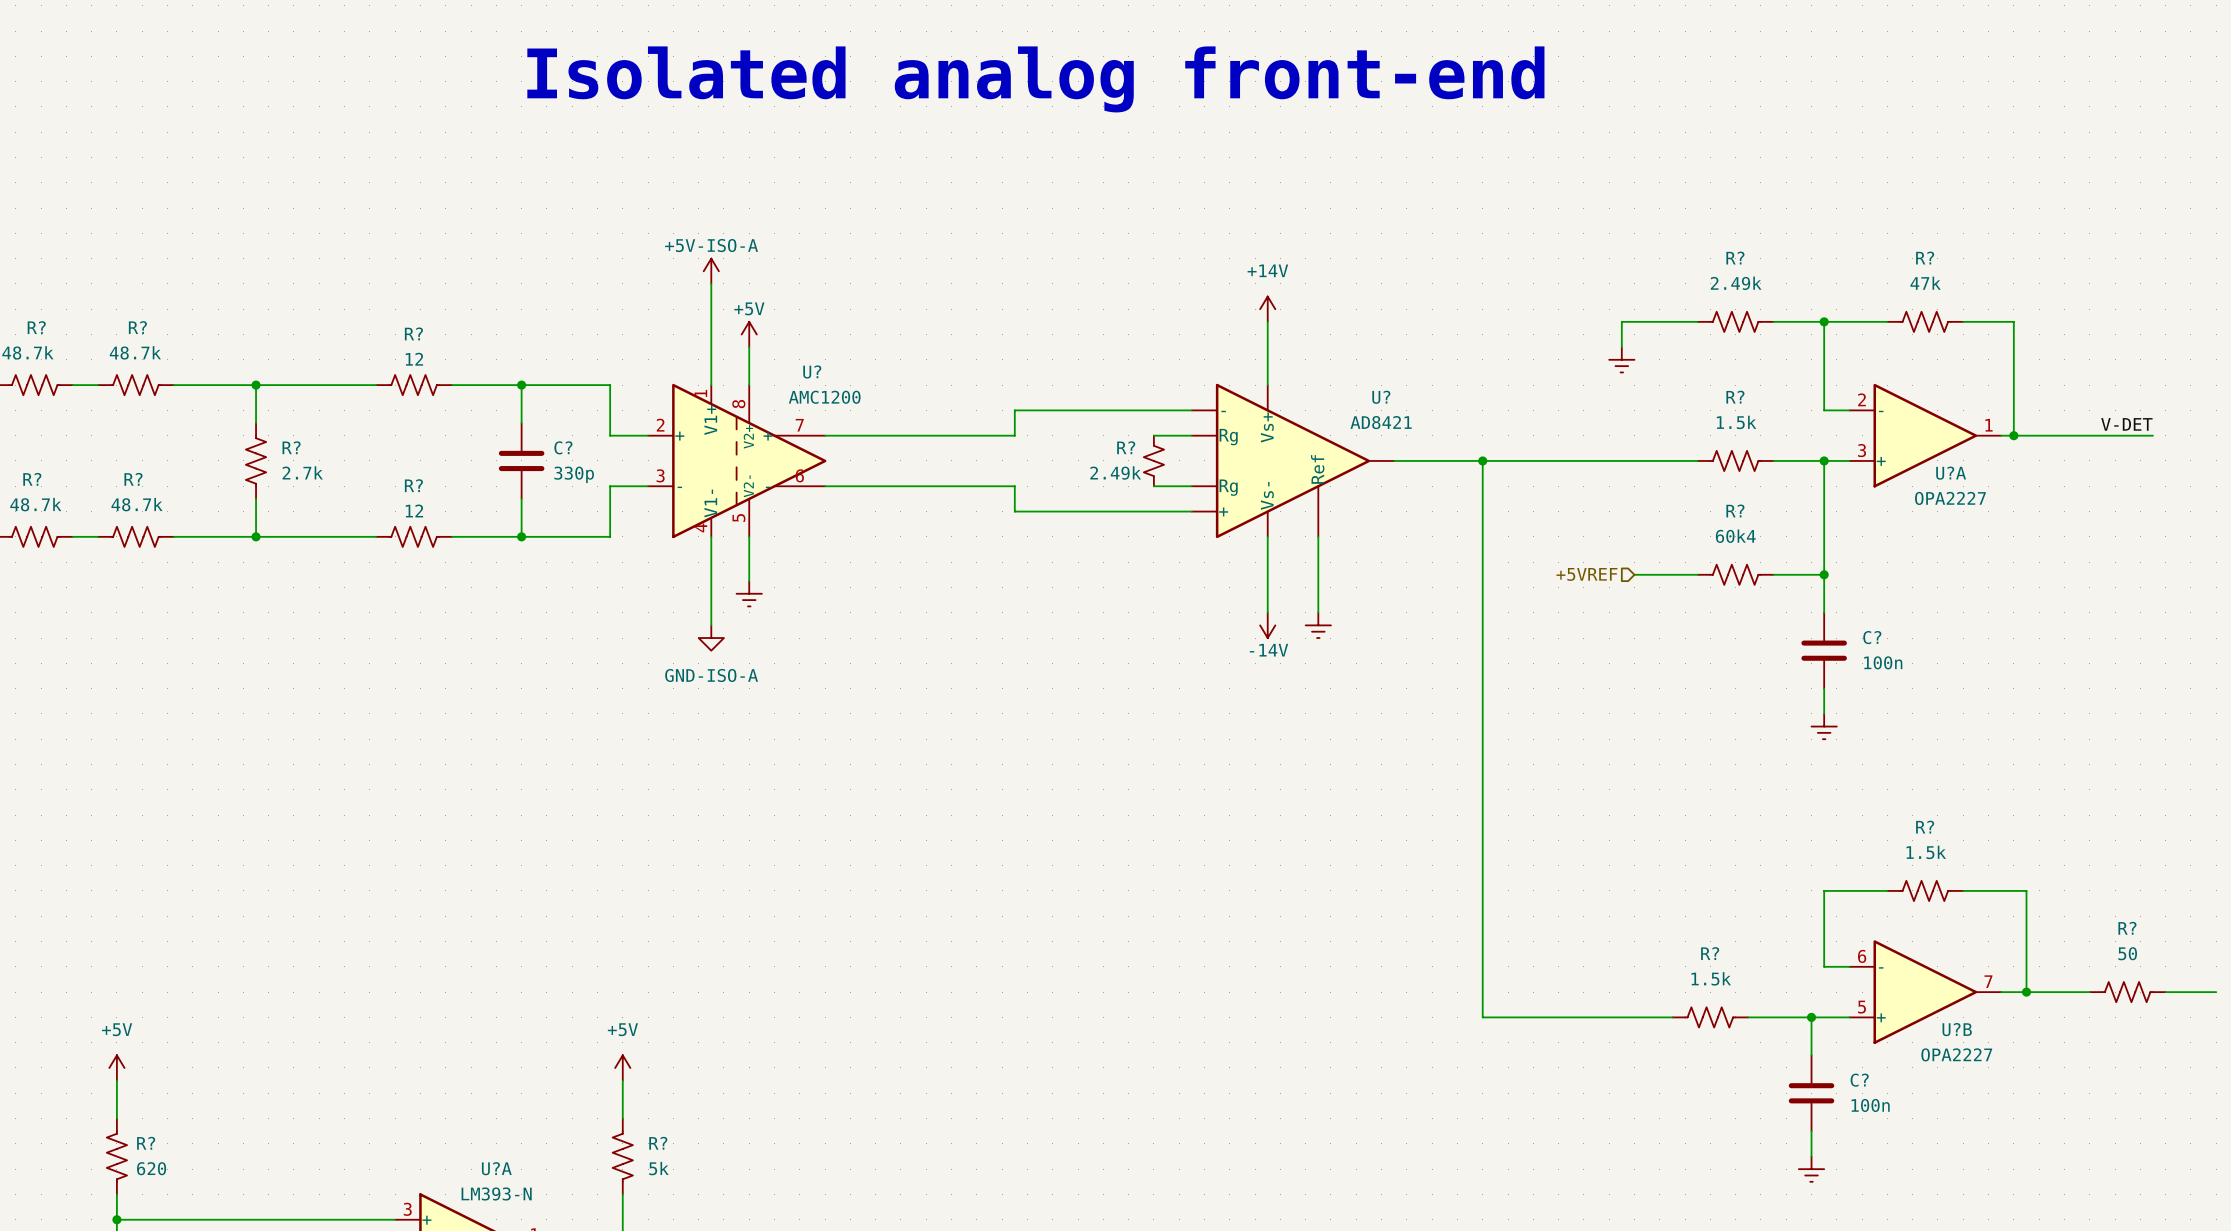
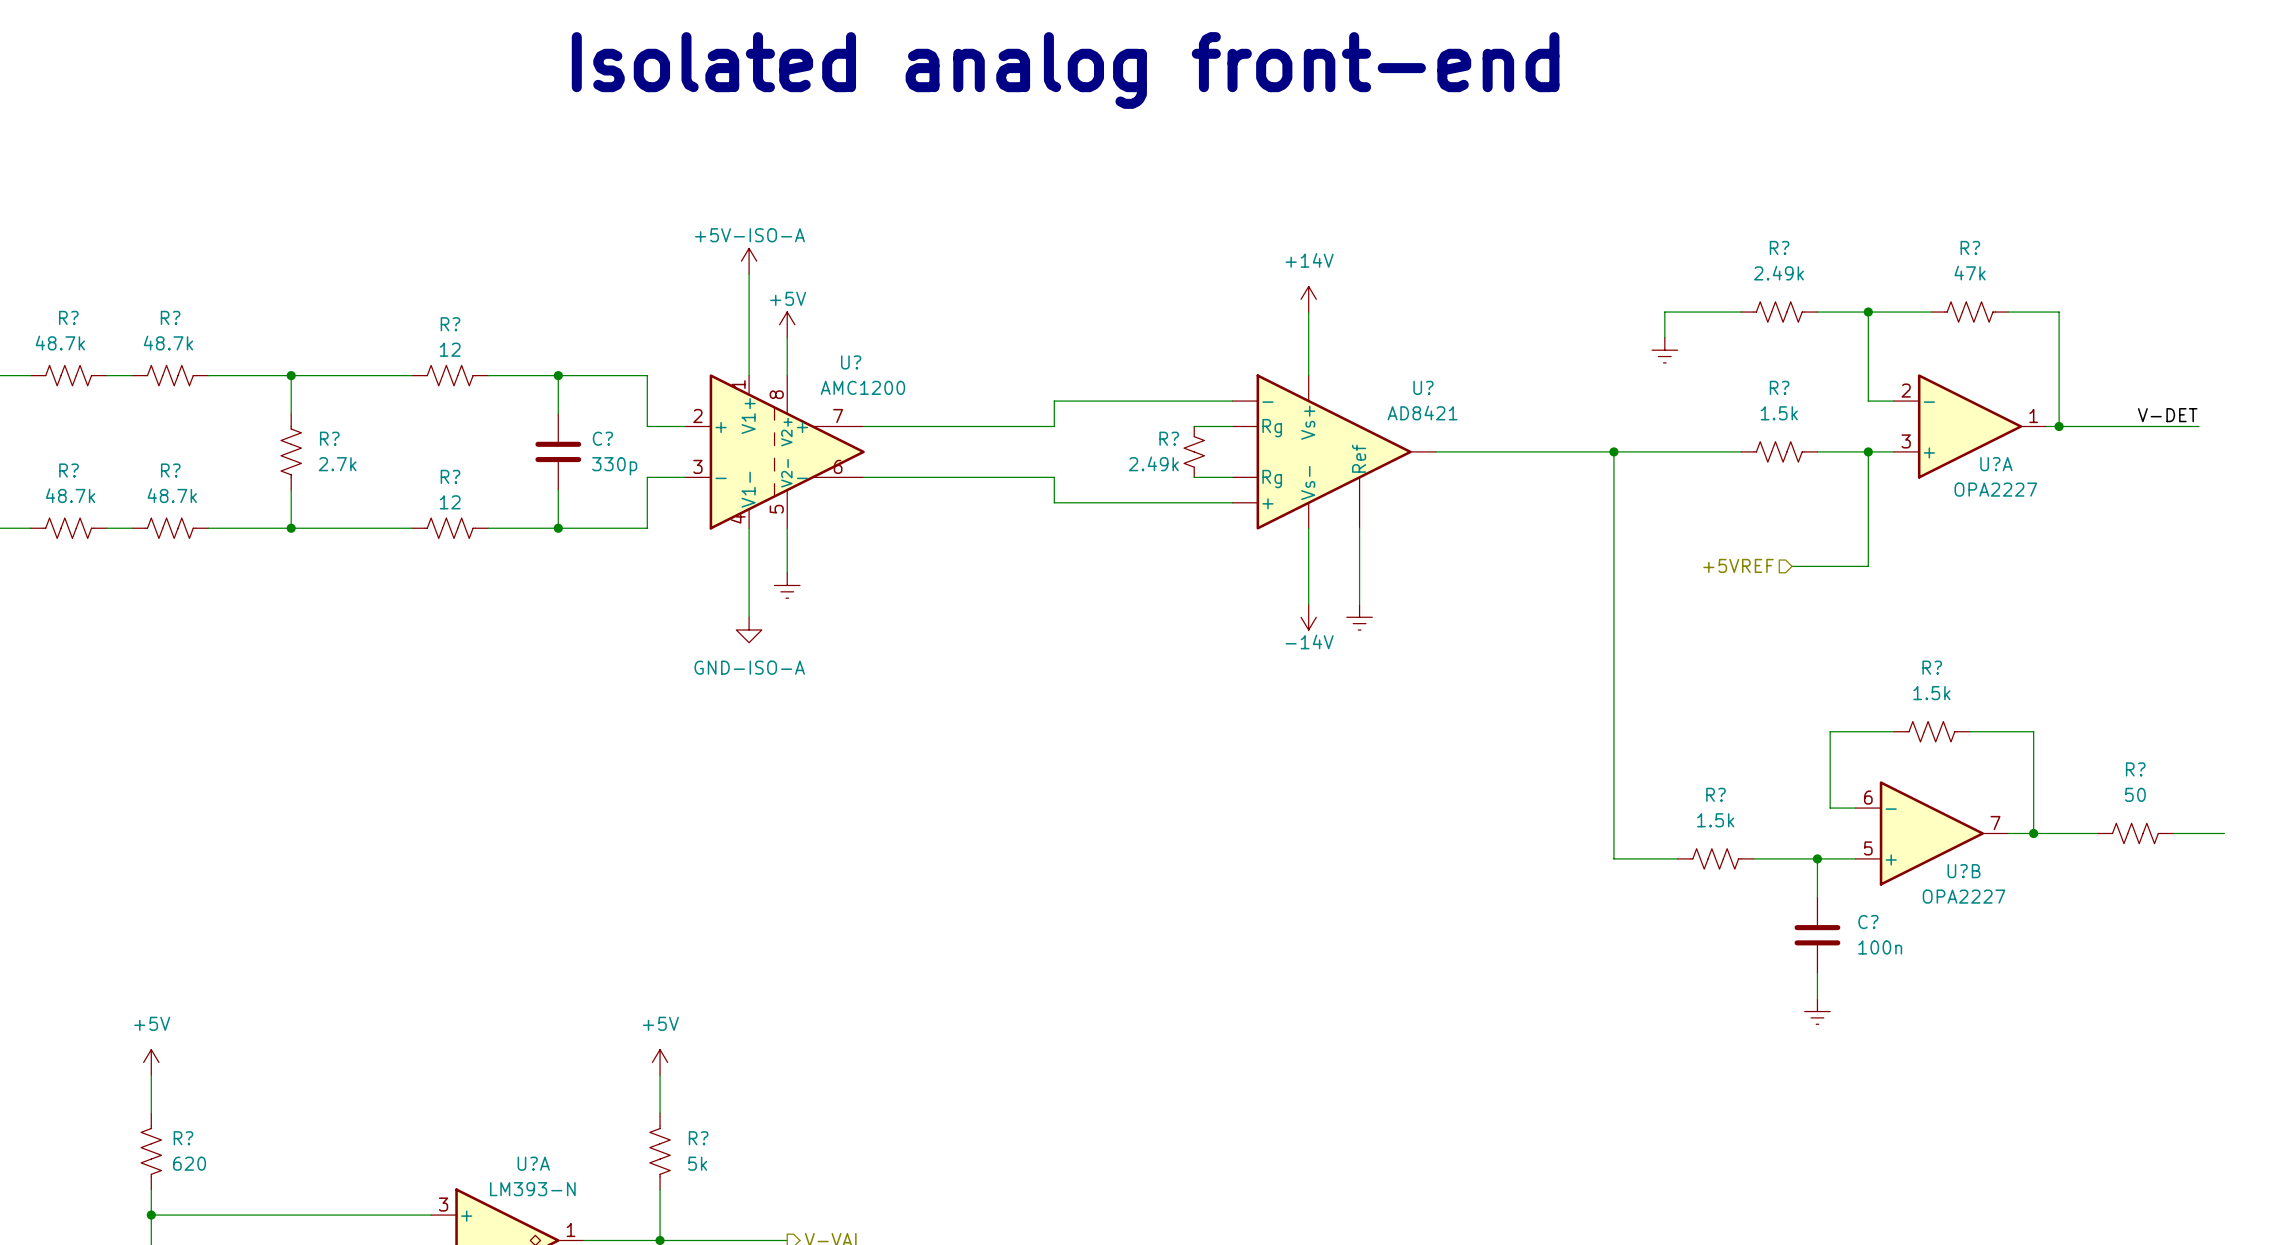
wire: (1482, 460) (1482, 1017) (1672, 1017) -> none
junction: (1482, 460) -> none
wire: none -> (1613, 451) (1613, 858) (1677, 858)
junction: none -> (1613, 451)
hierarchical label position: +5VREF (1586, 574) -> +5VREF (1738, 565)
wire: (1634, 574) (1697, 574) -> none
R?: 60k4 (1735, 574) -> none
wire: (1824, 574) (1824, 612) -> none
junction: (1824, 574) -> none
C?: 100n (1824, 650) -> none
wire: (1824, 688) (1824, 713) -> none
power symbol: (1824, 726) -> none
R?: none -> 1.5k (1931, 731)
junction: none -> (2033, 833)
R?: none -> 1.5k (1715, 858)
junction: none -> (1817, 858)
wire: (1887, 890) (1824, 890) (1824, 966) (1849, 966) -> (1893, 731) (1830, 731) (1830, 808) (1855, 808)
R?: 1.5k (1925, 890) -> none
wire: (1963, 890) (2026, 890) (2026, 992) -> (1970, 731) (2033, 731) (2033, 833)
C?: none -> 100n (1817, 935)
U?B position: (1925, 992) -> (1931, 833)
wire: (2001, 992) (2089, 992) -> (2008, 833) (2097, 833)
junction: (2026, 992) -> none
R? position: (2127, 992) -> (2135, 833)
wire: (2165, 992) (2216, 992) -> (2173, 833) (2224, 833)
R?: 1.5k (1710, 1017) -> none
wire: (1748, 1017) (1849, 1017) -> (1753, 858) (1855, 858)
power symbol: none -> (1817, 1011)
wire: (1811, 1017) (1811, 1055) -> (1817, 858) (1817, 897)
junction: (1811, 1017) -> none
C?: 100n (1811, 1093) -> none
wire: (1811, 1131) (1811, 1156) -> (1817, 973) (1817, 998)
power symbol: (1811, 1169) -> none

